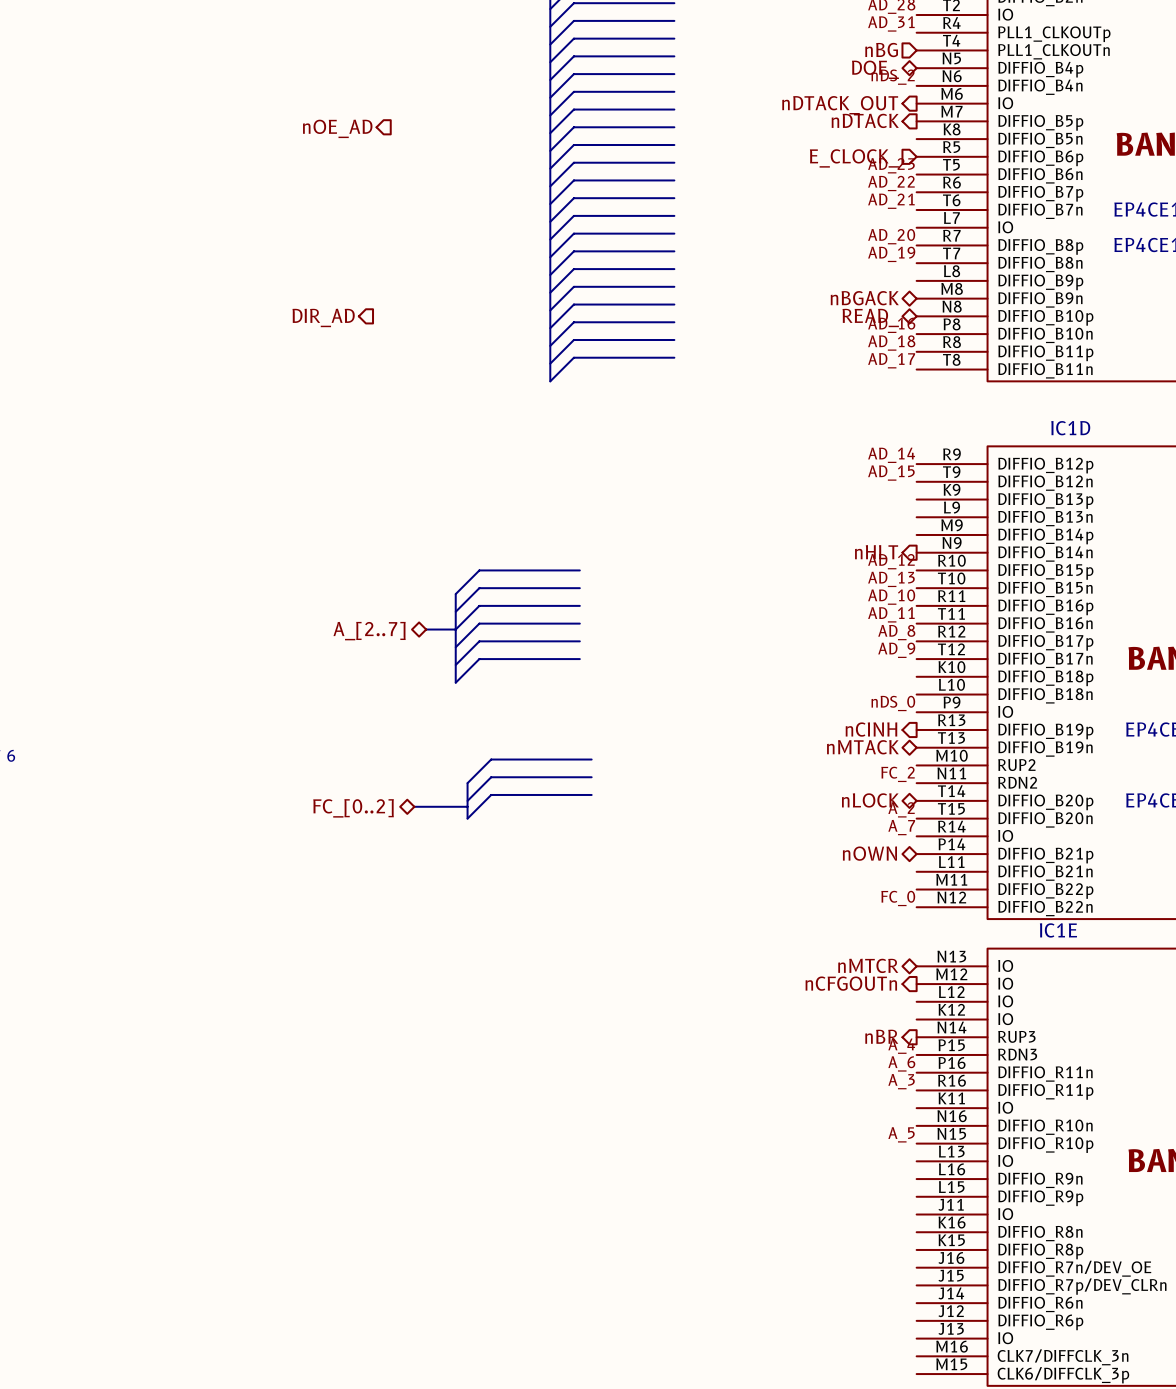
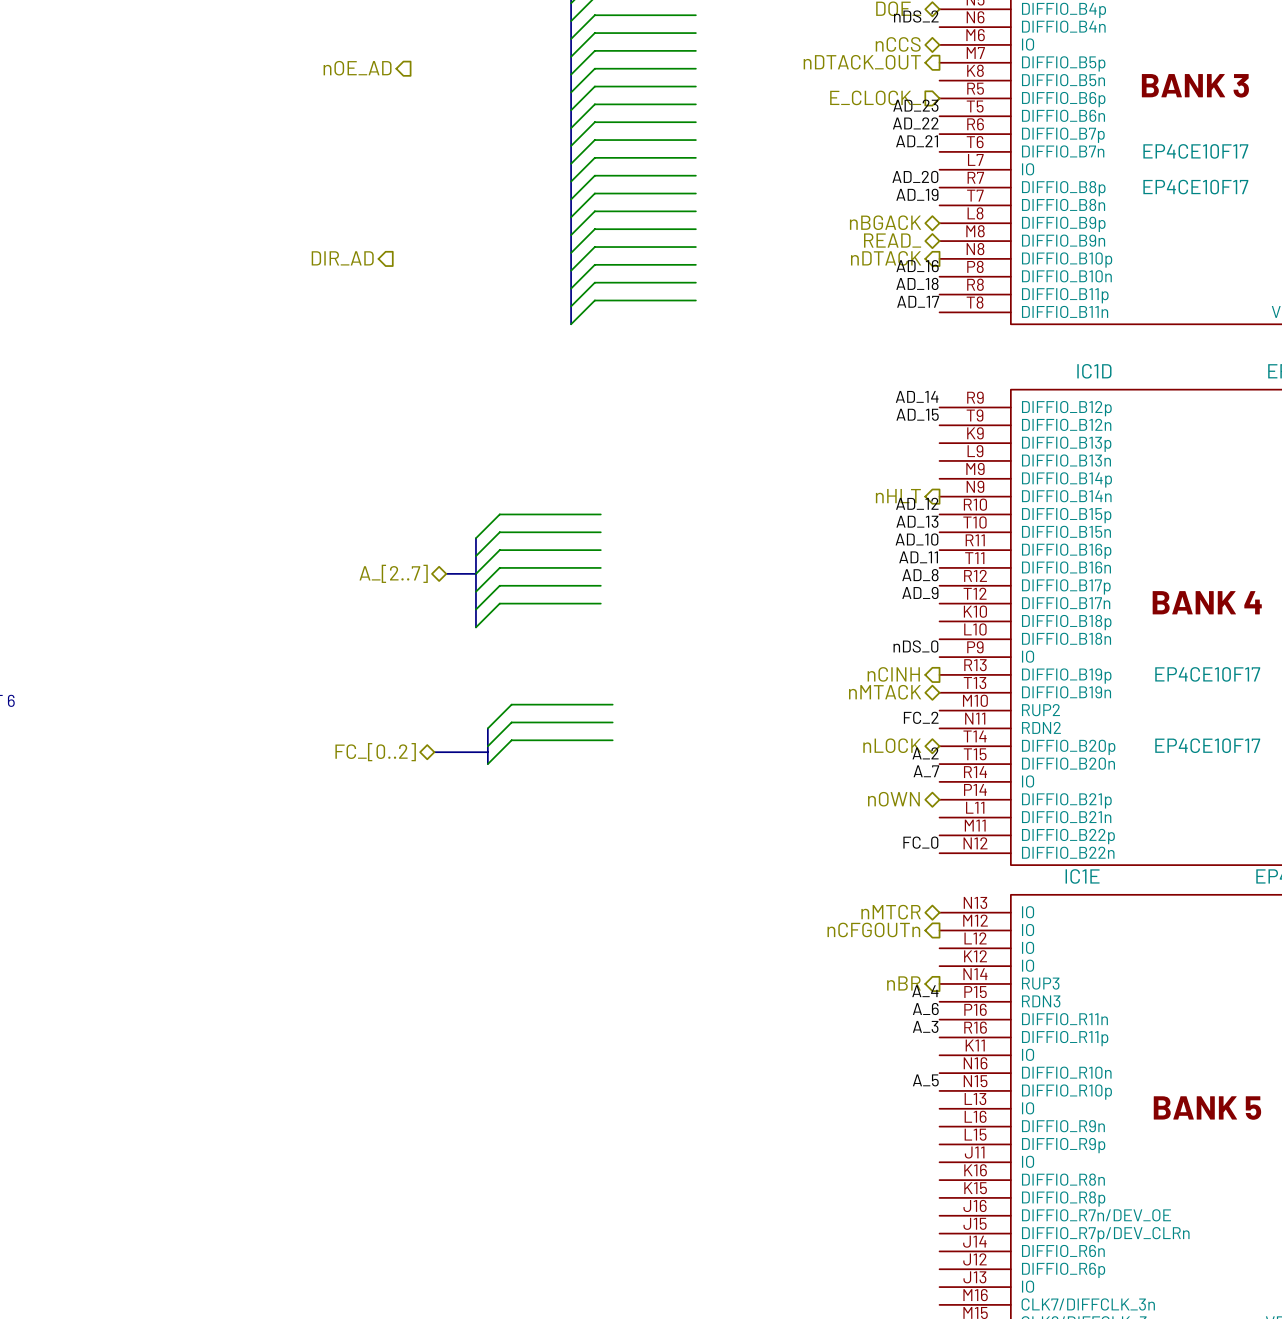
hierarchical label shape: output (840, 105) -> bidirectional (898, 44)
hierarchical label: nDTACK_OUT (840, 105) -> nCCS (898, 44)
hierarchical label: nDTACK (865, 120) -> nDTACK_OUT (862, 62)
hierarchical label: none -> nBGACK (885, 222)
hierarchical label: nBGACK (864, 298) -> READ_ (892, 240)
hierarchical label shape: bidirectional (870, 317) -> output (886, 258)
hierarchical label: READ_ (870, 317) -> nDTACK (886, 258)

